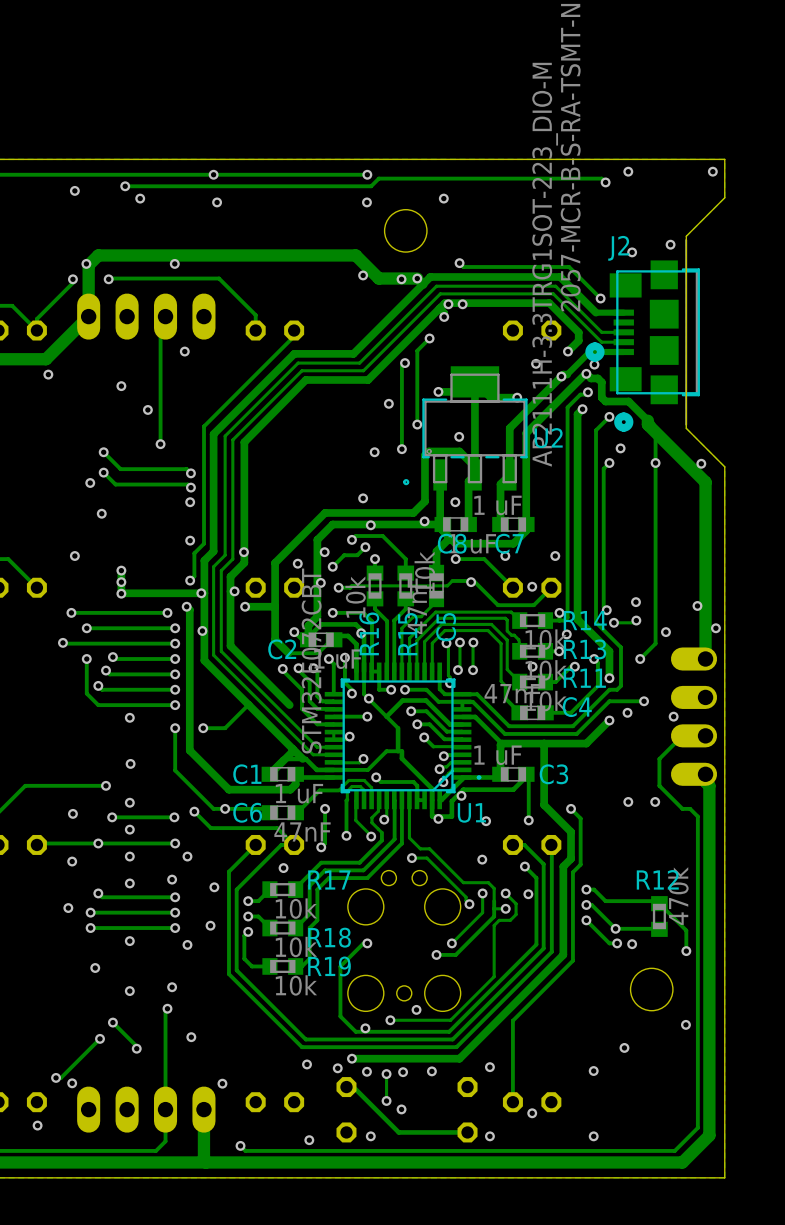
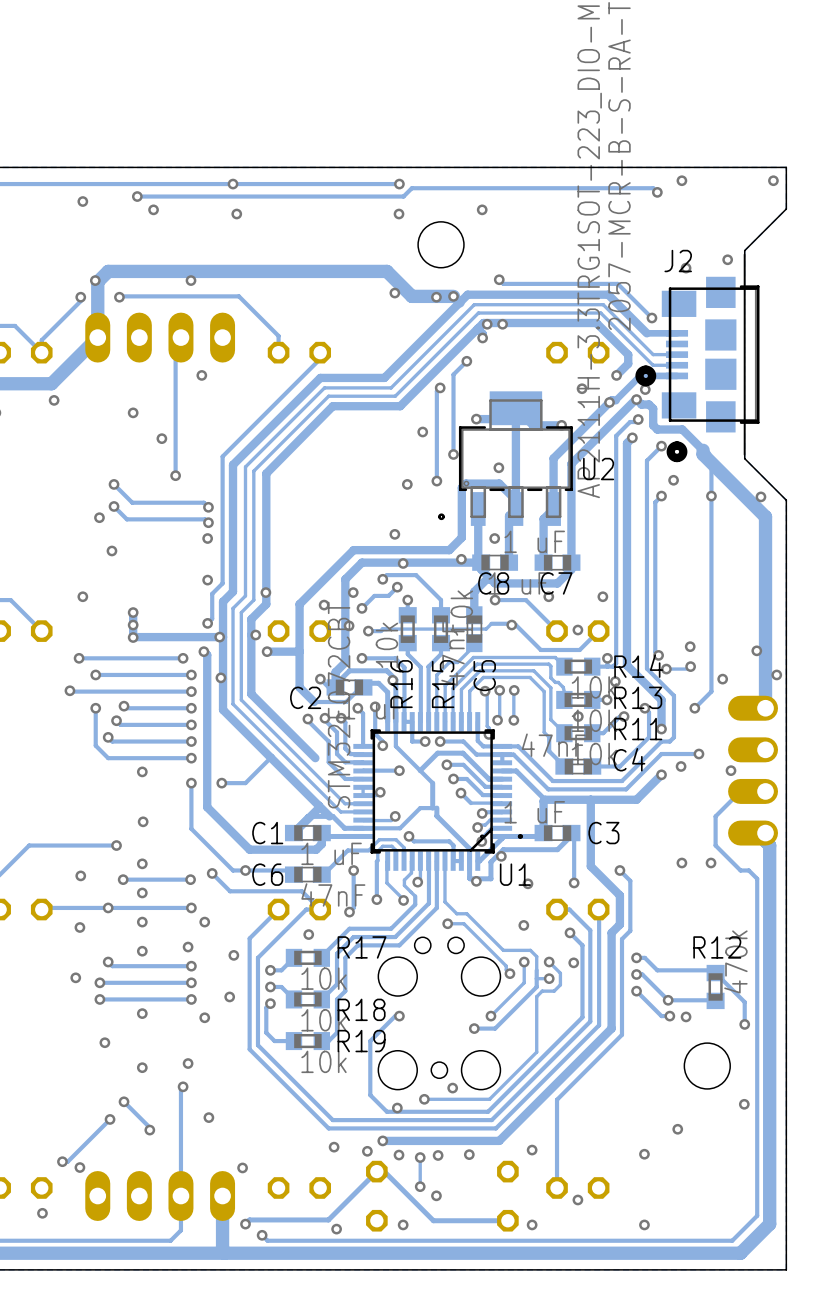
via: (368, 698) -> none
track: none -> (376, 1171) (328, 1219) (249, 1219) (245, 1224)
via: none -> (245, 1224)

